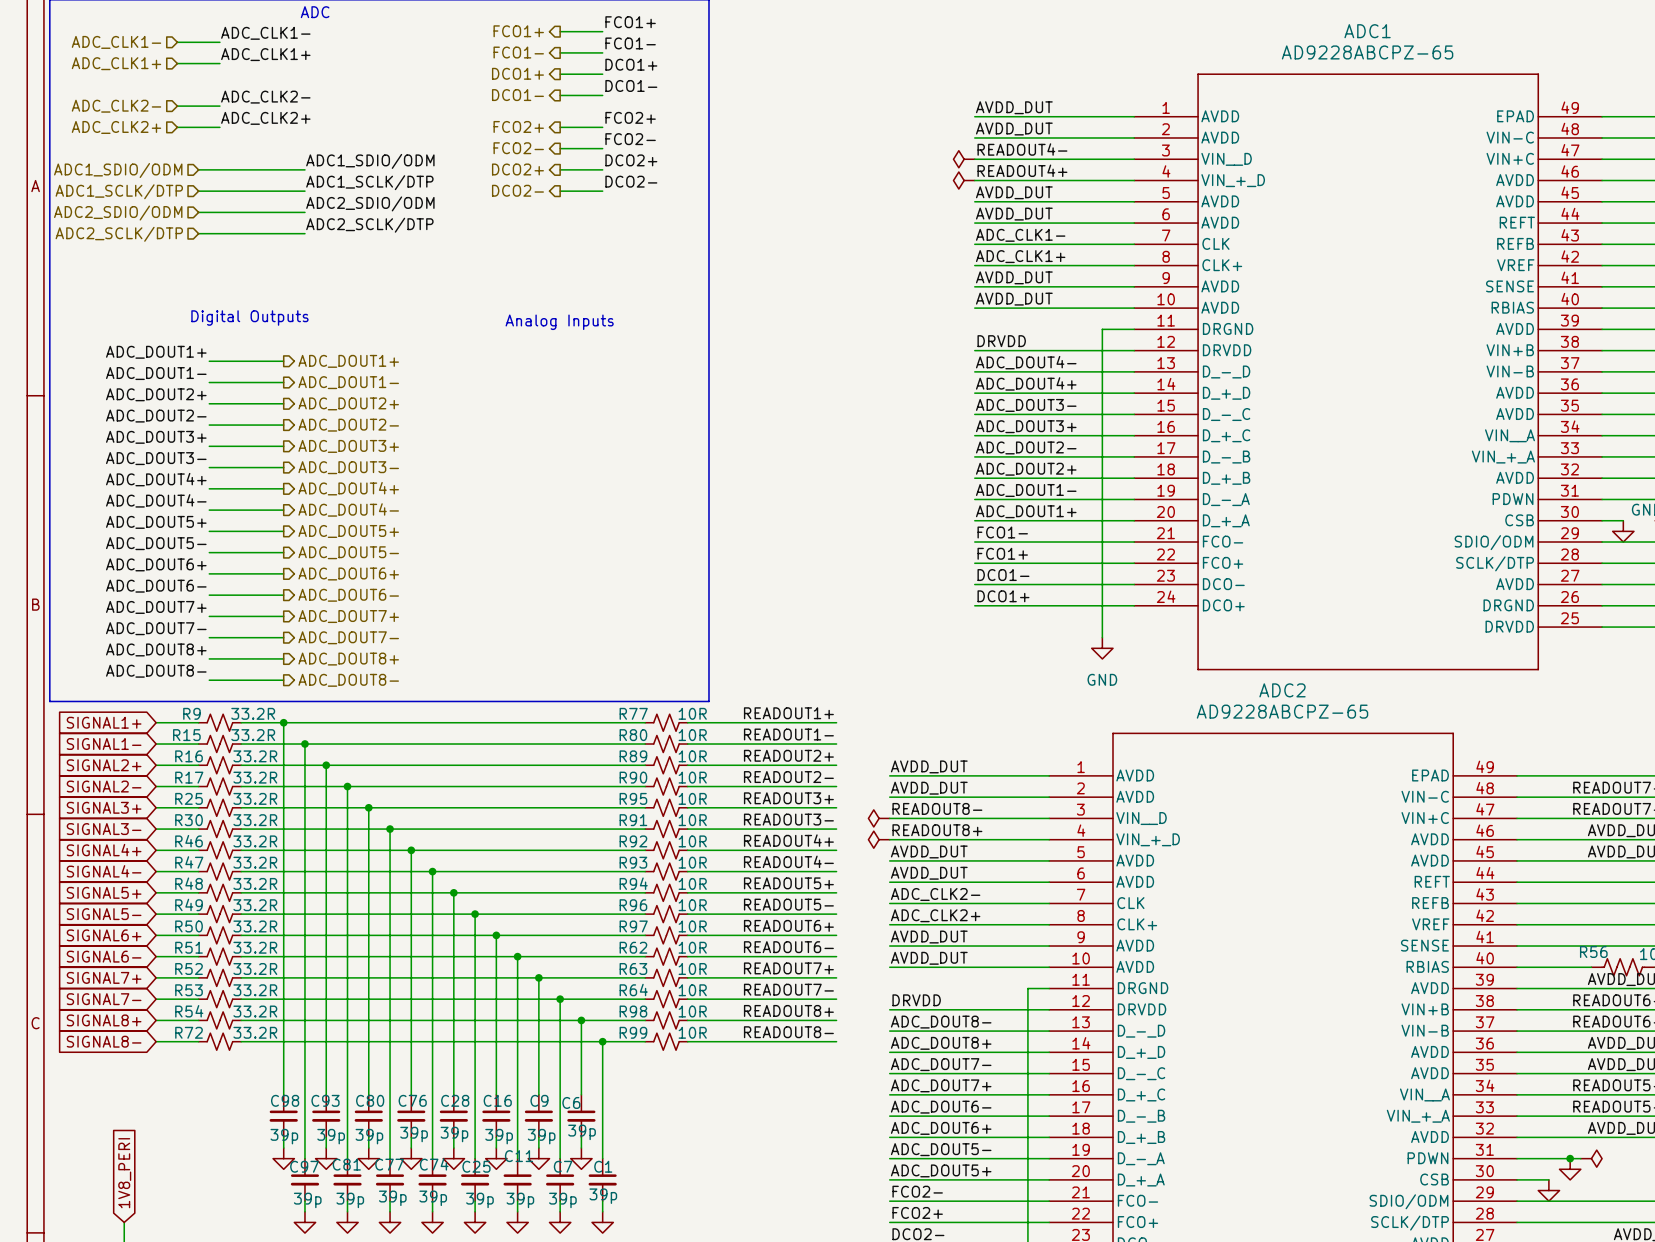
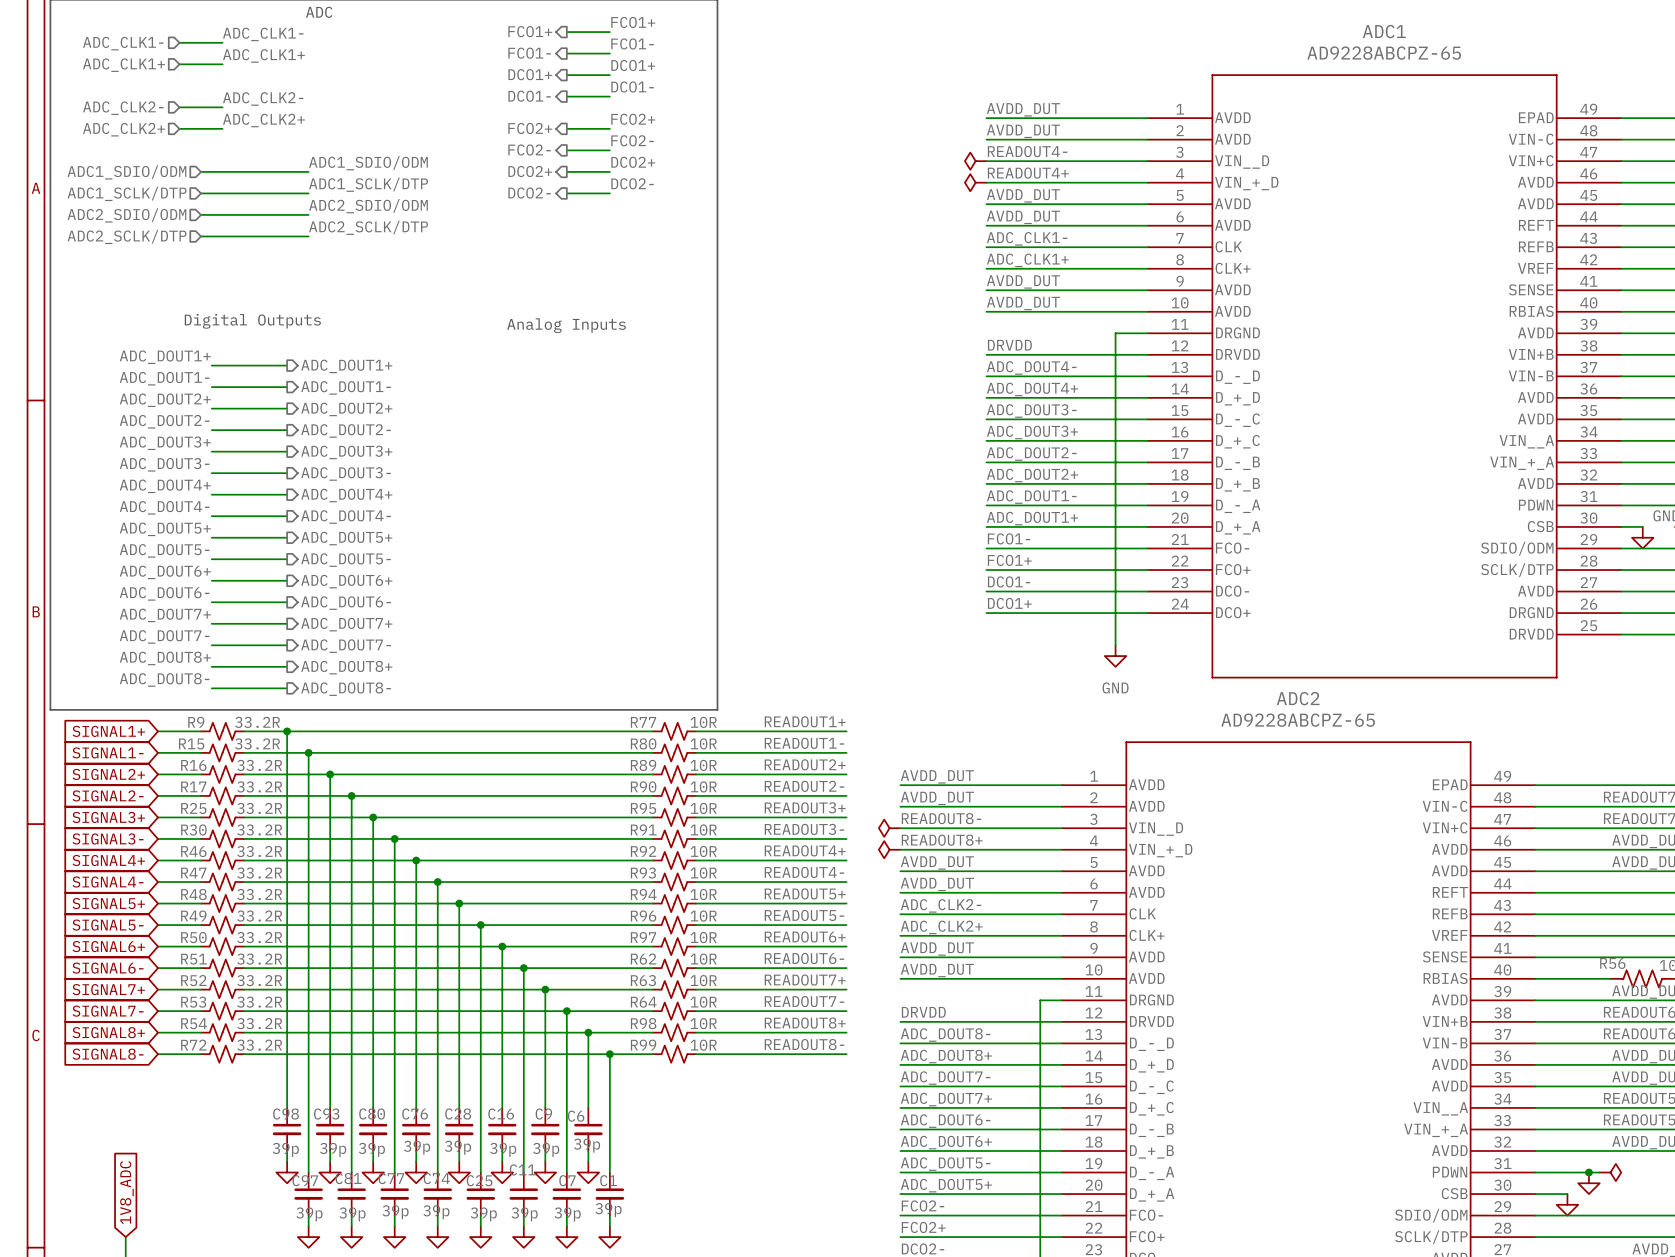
global label: 1V8_PERI (124, 1173) -> 1V8_ADC (126, 1192)

